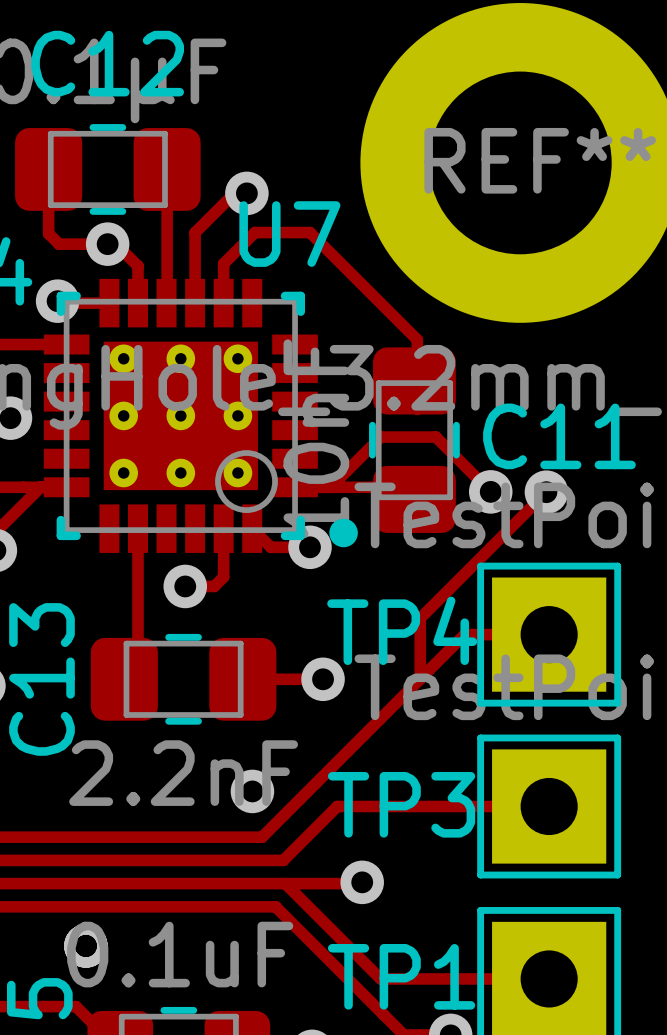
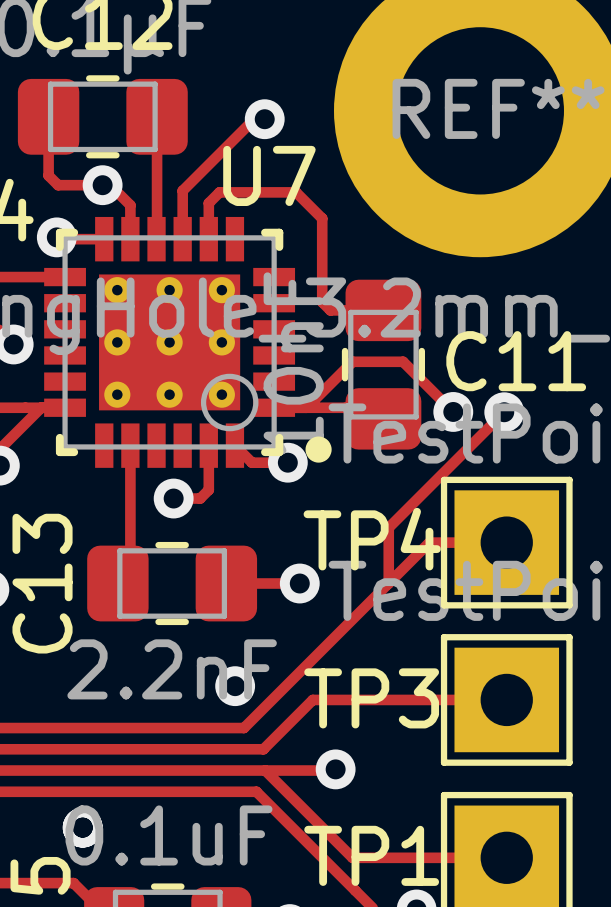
track: (246, 193) (234, 193) (195, 232) (195, 250) -> (264, 119) (254, 119) (182, 190)
via position: (246, 193) -> (264, 119)
track: (235, 252) (254, 232) (310, 232) (417, 339) (417, 409) -> (219, 192) (296, 192) (322, 218) (322, 302) (330, 310) (383, 310)

